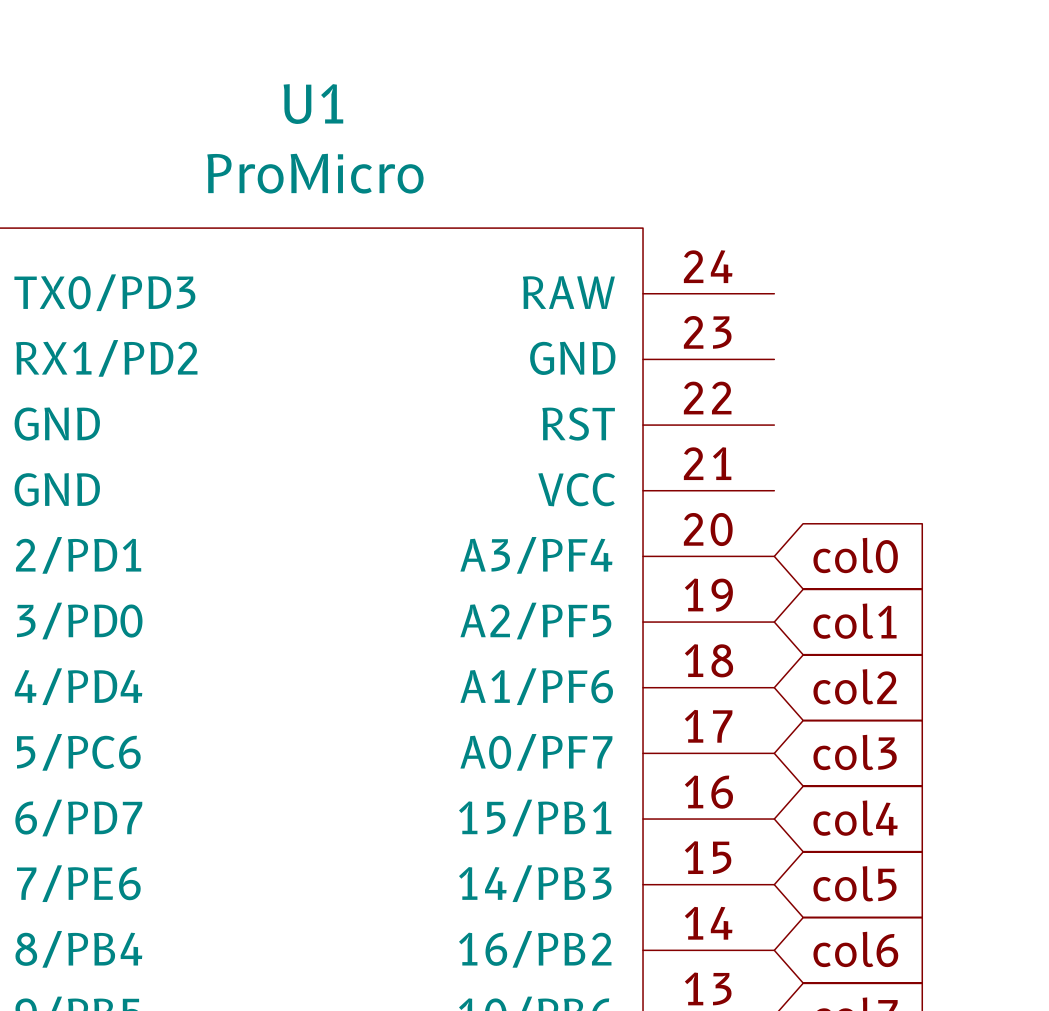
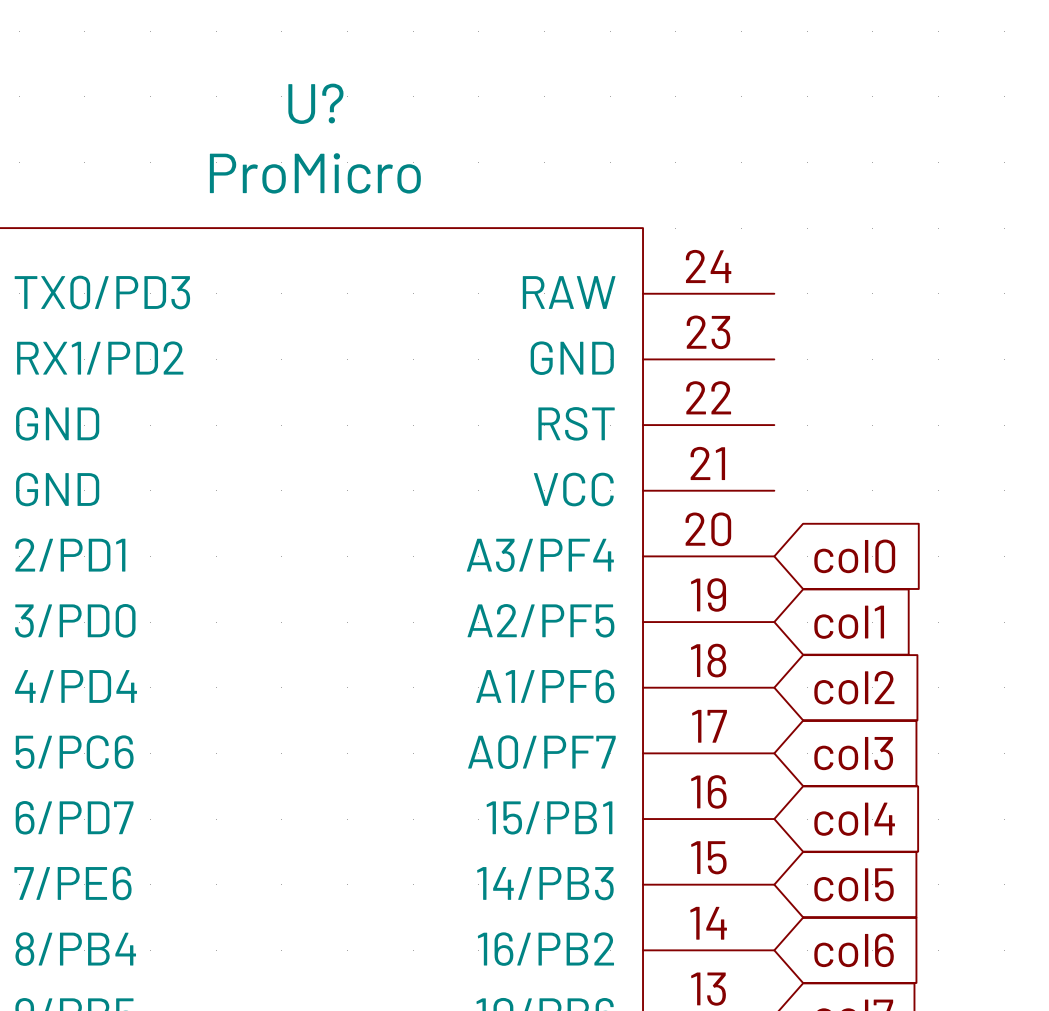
U1 name: U1 (313, 104) -> U? (315, 103)

